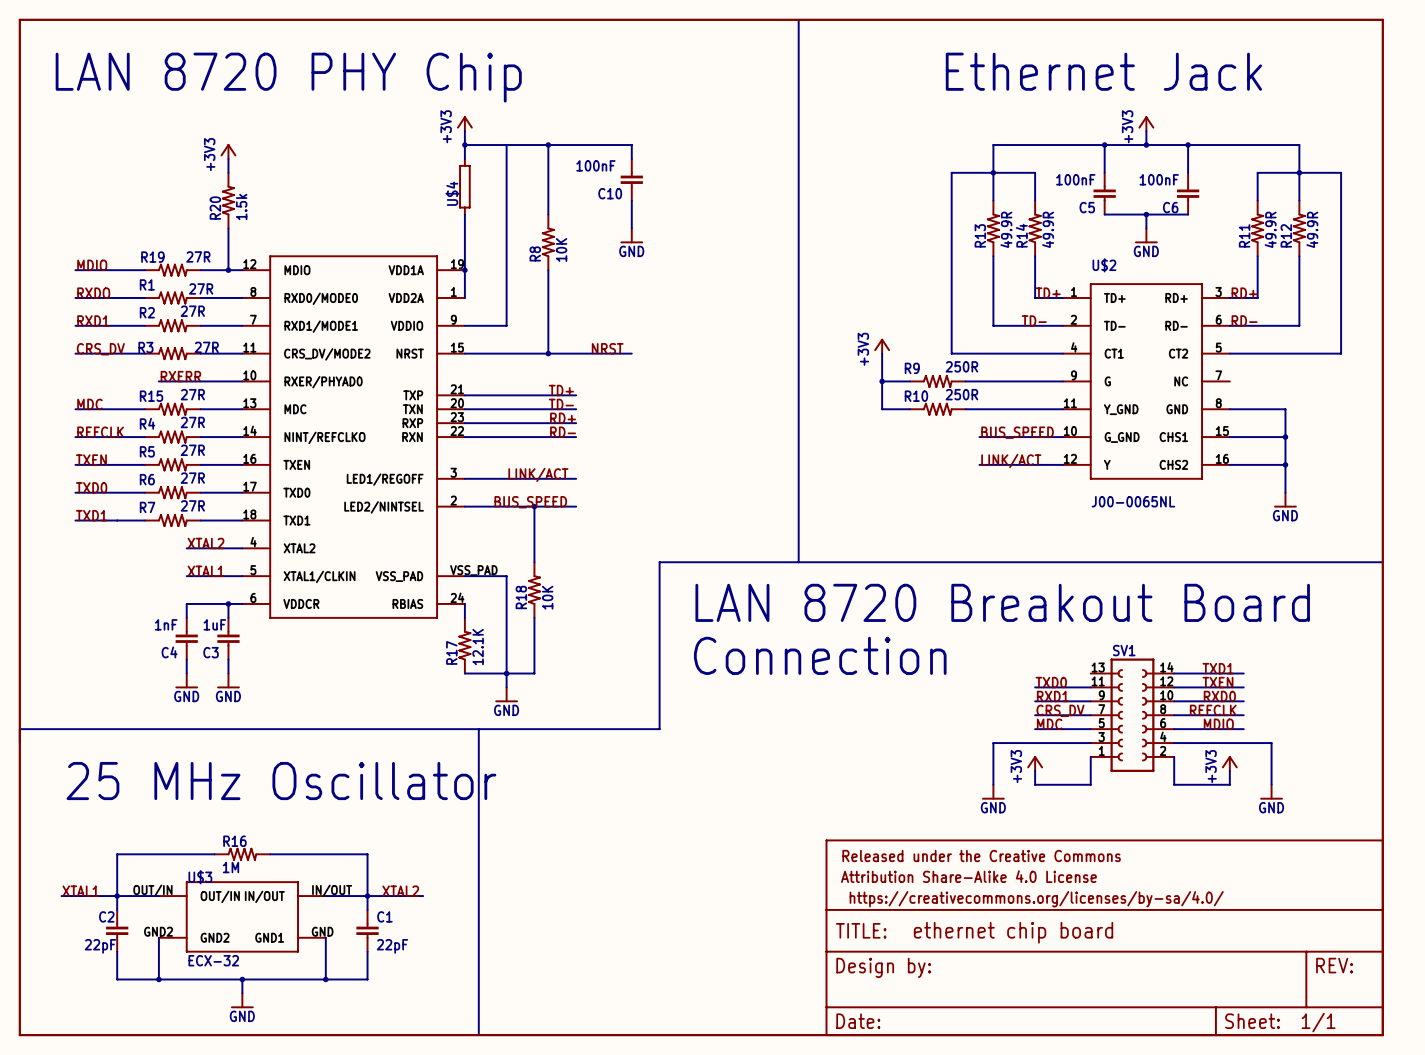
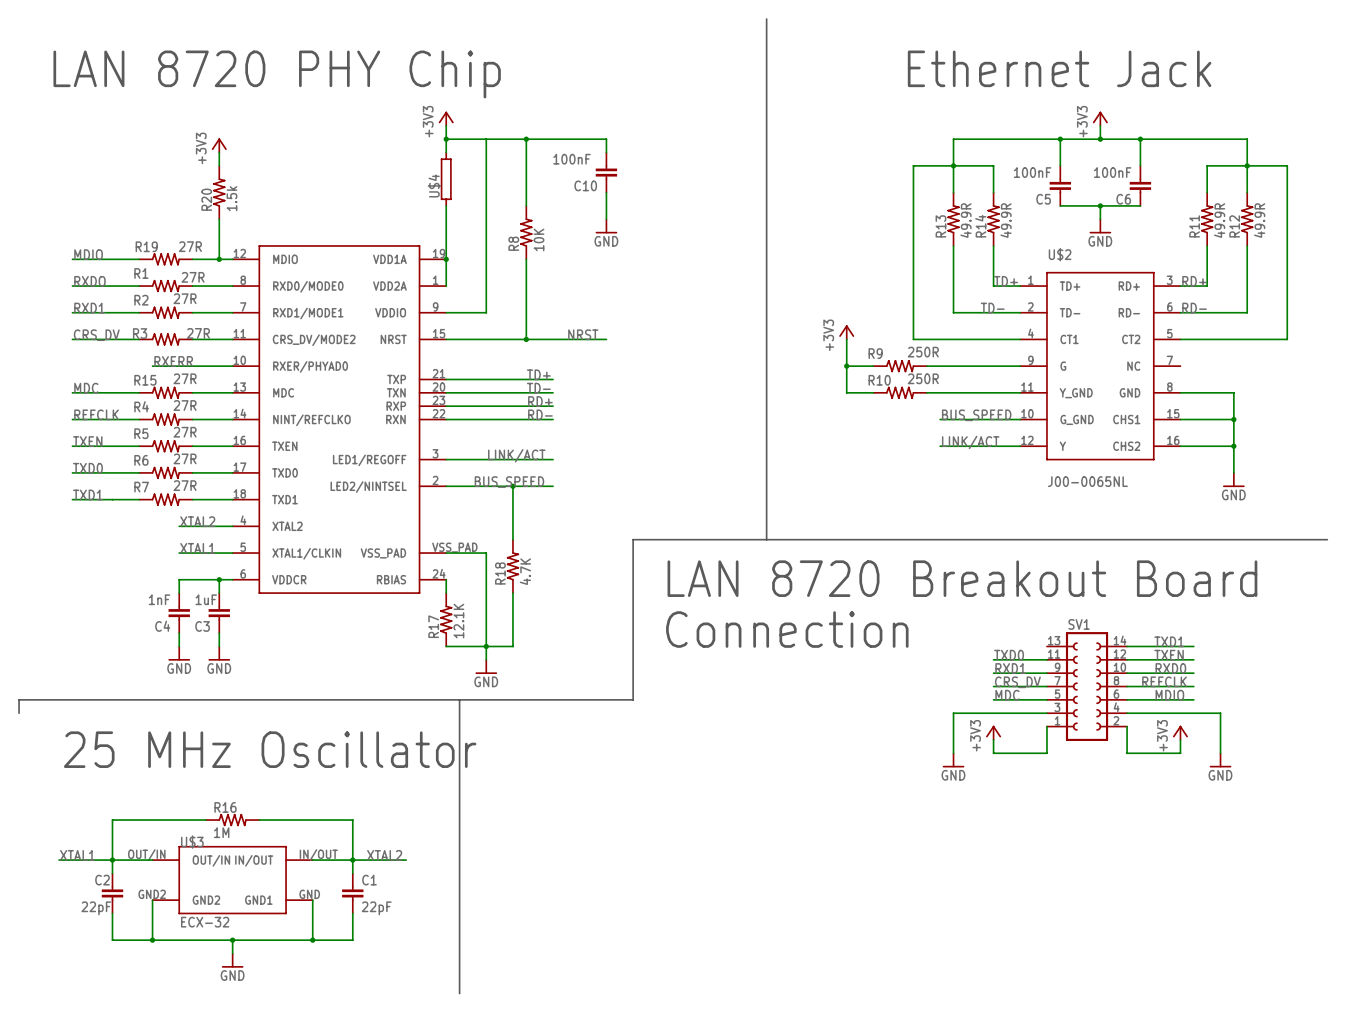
part: (701, 527) -> none
R18 value: 10K (547, 597) -> 4.7K (525, 571)
part: (1104, 937) -> none

